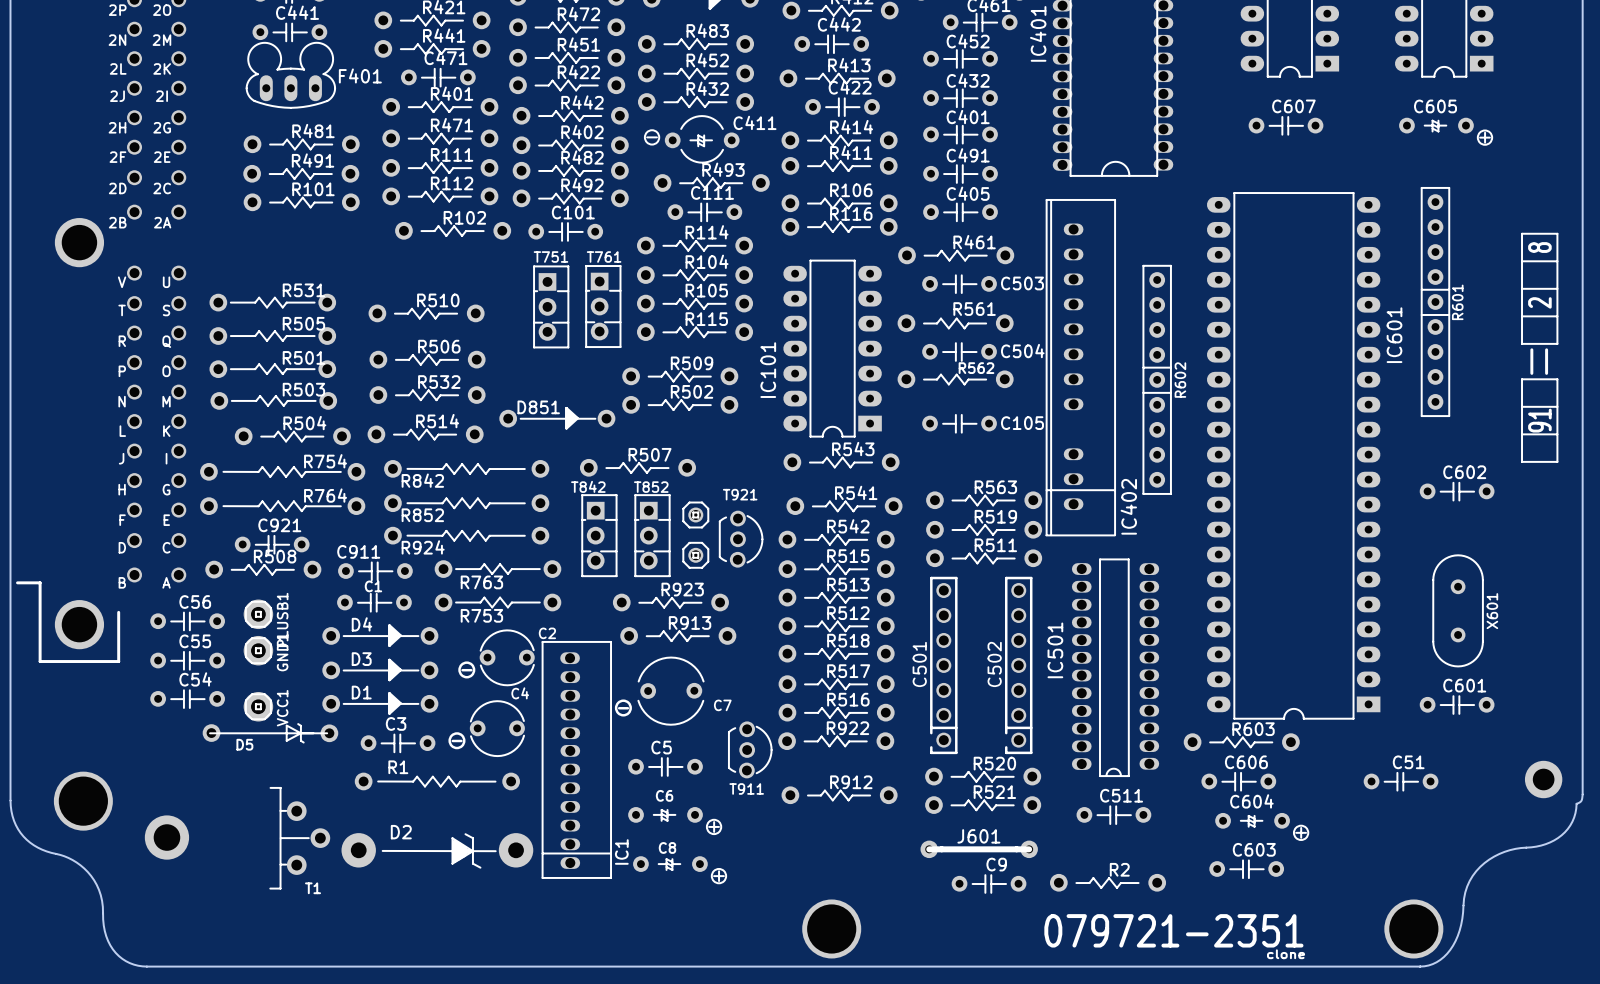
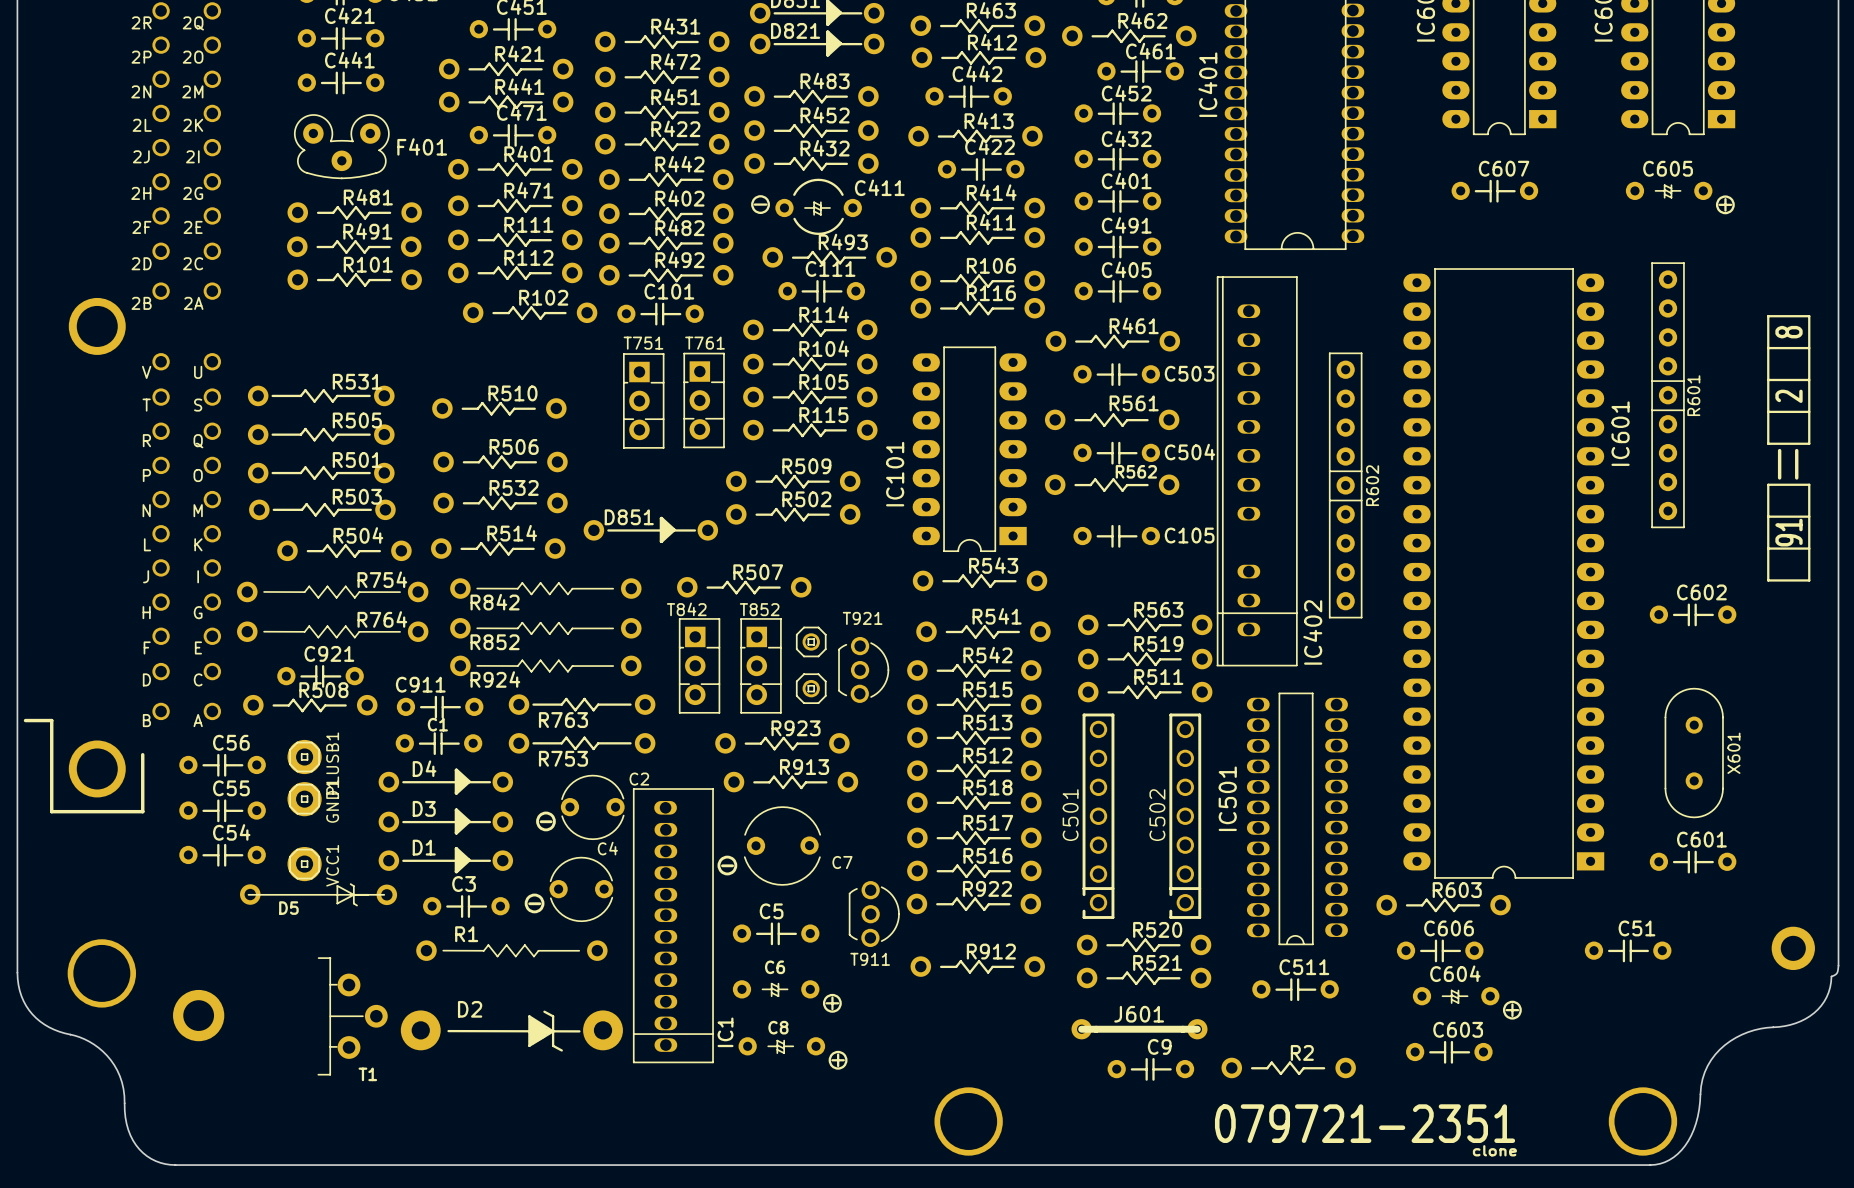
F401 footprint: [246, 42, 336, 109] -> [294, 114, 390, 180]

